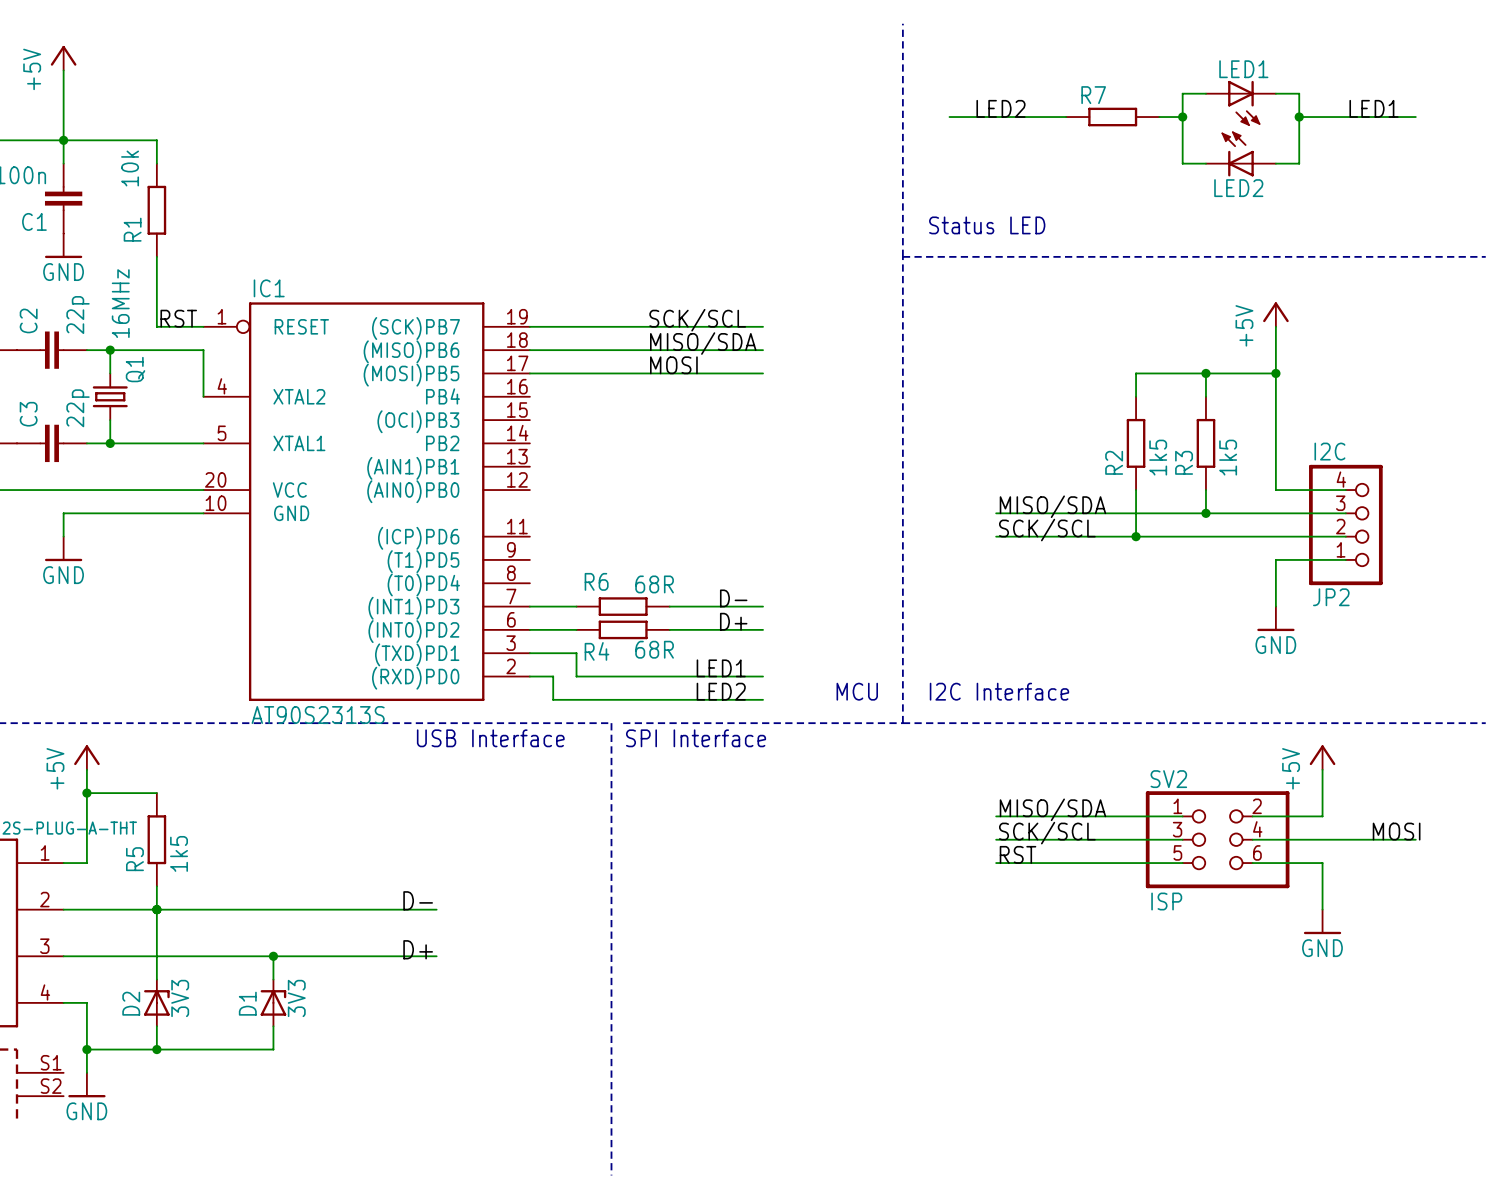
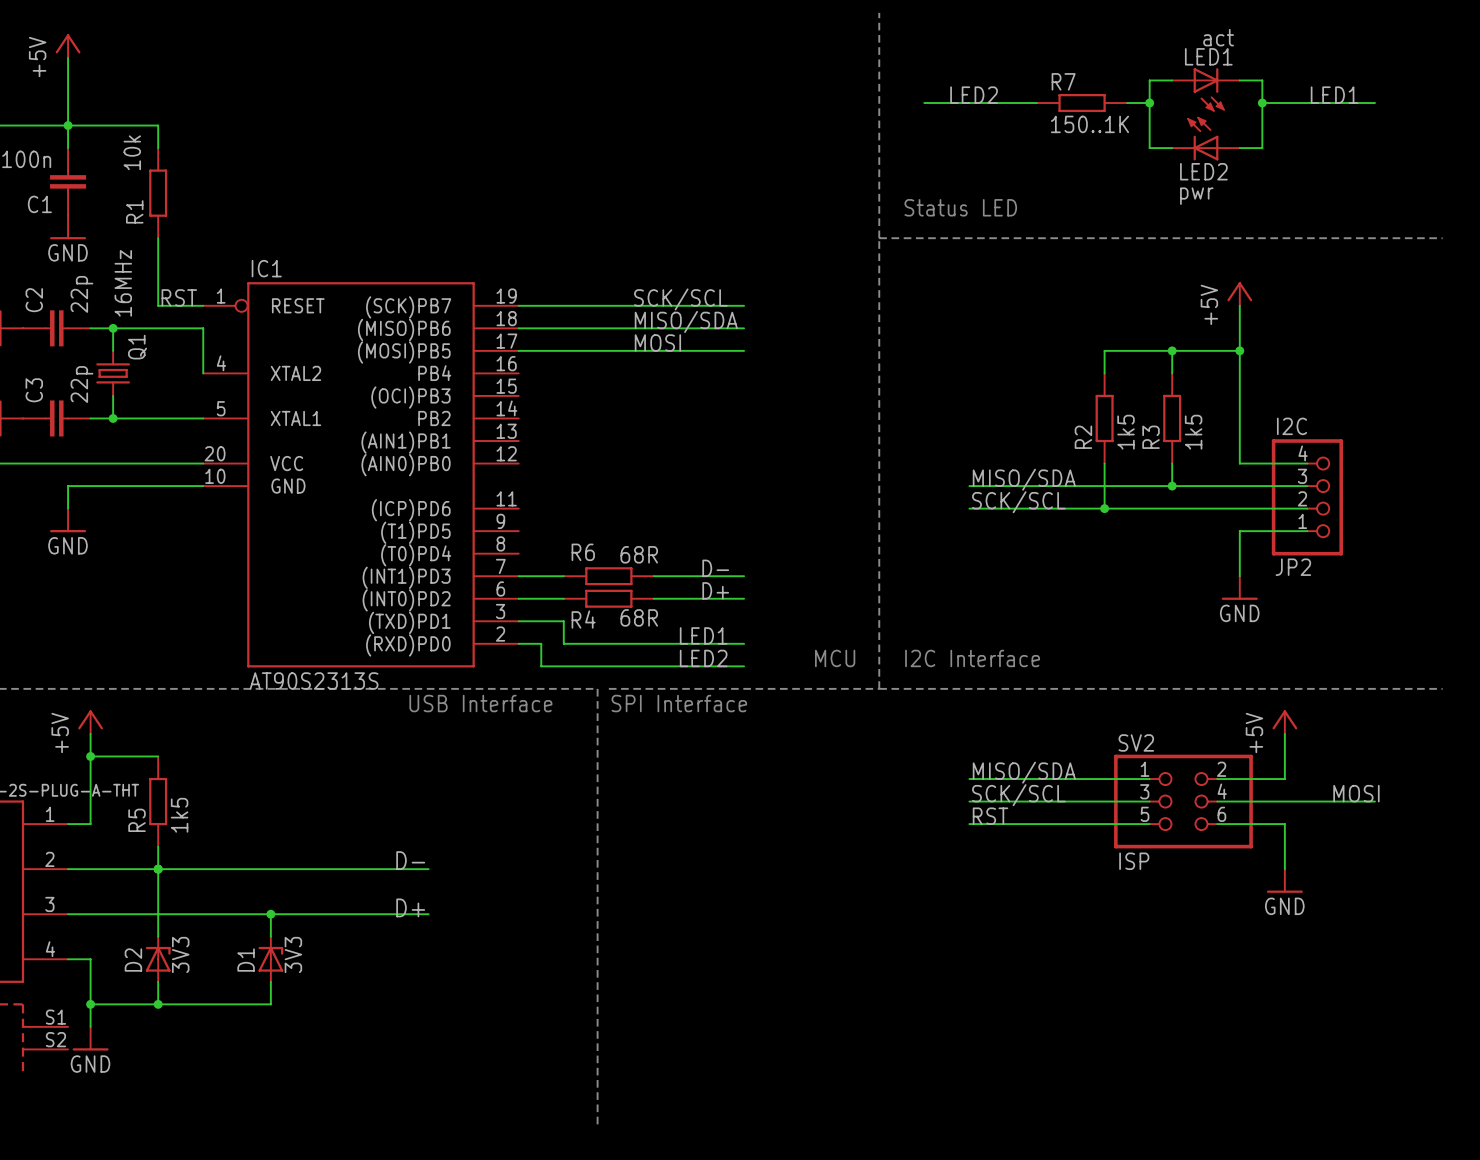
LED1 value: none -> act (1218, 37)
R7 value: none -> 150..1K (1089, 124)
LED2 value: none -> pwr (1196, 196)

